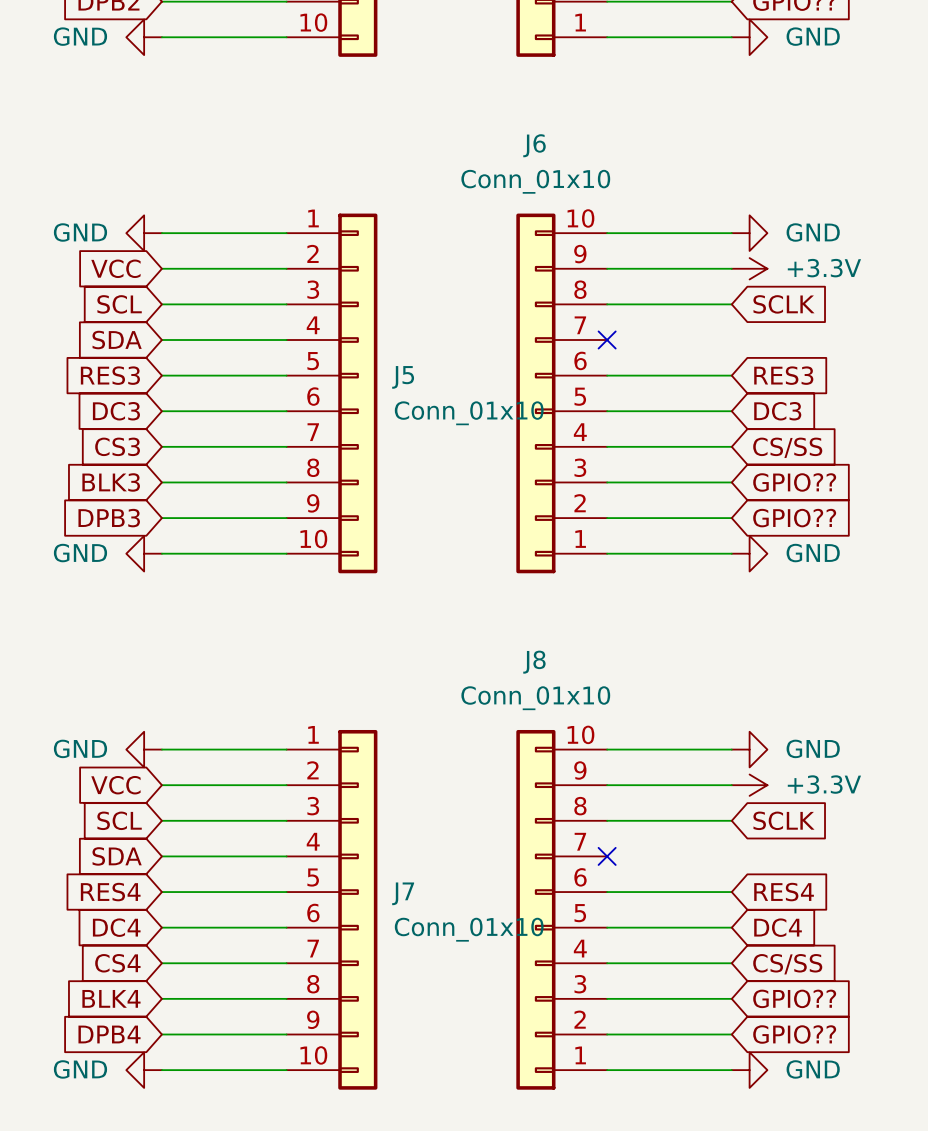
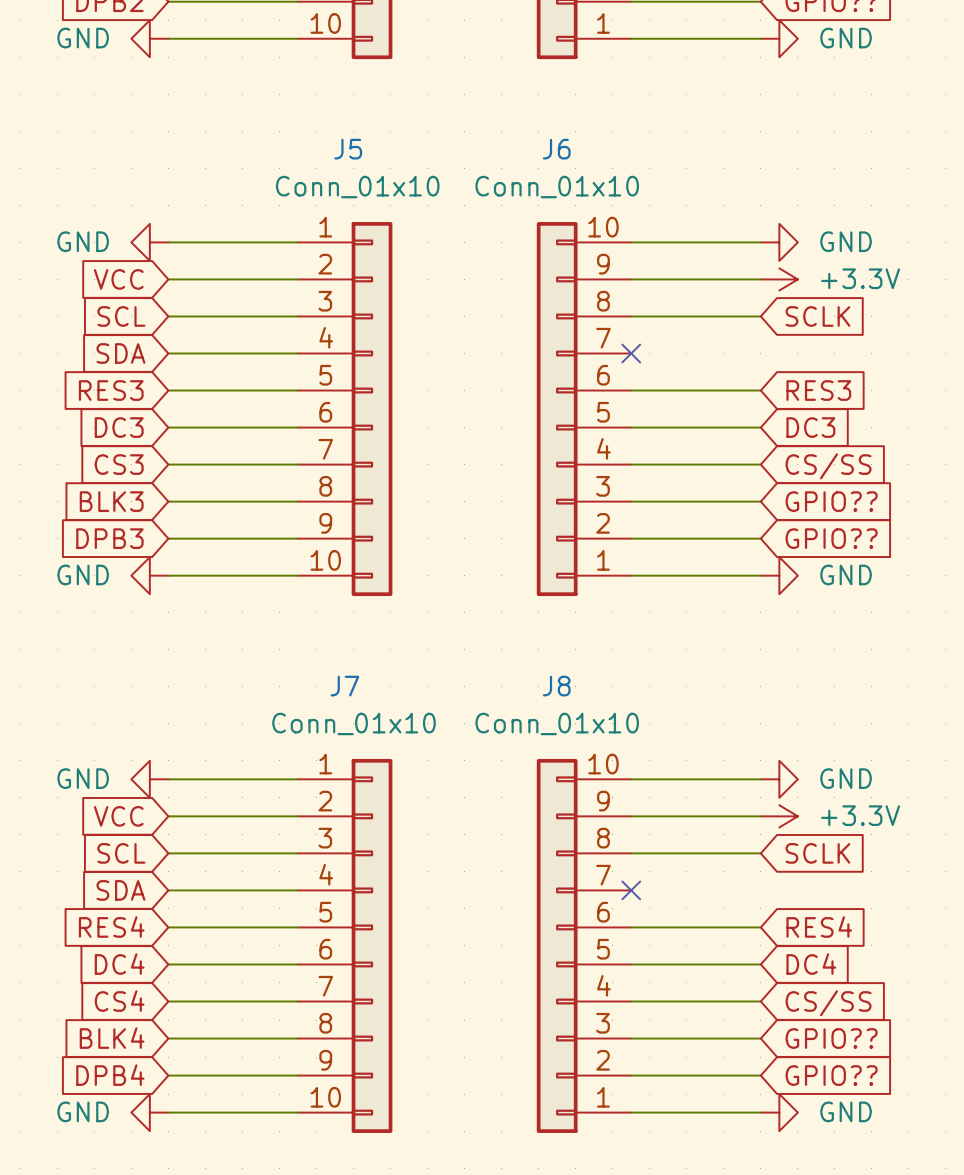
J5 name position: J5 (403, 377) -> J5 (348, 149)
J5 value position: Conn_01x10 (469, 413) -> Conn_01x10 (357, 187)
J7 name position: J7 (403, 893) -> J7 (344, 686)
J7 value position: Conn_01x10 (469, 929) -> Conn_01x10 (354, 723)

